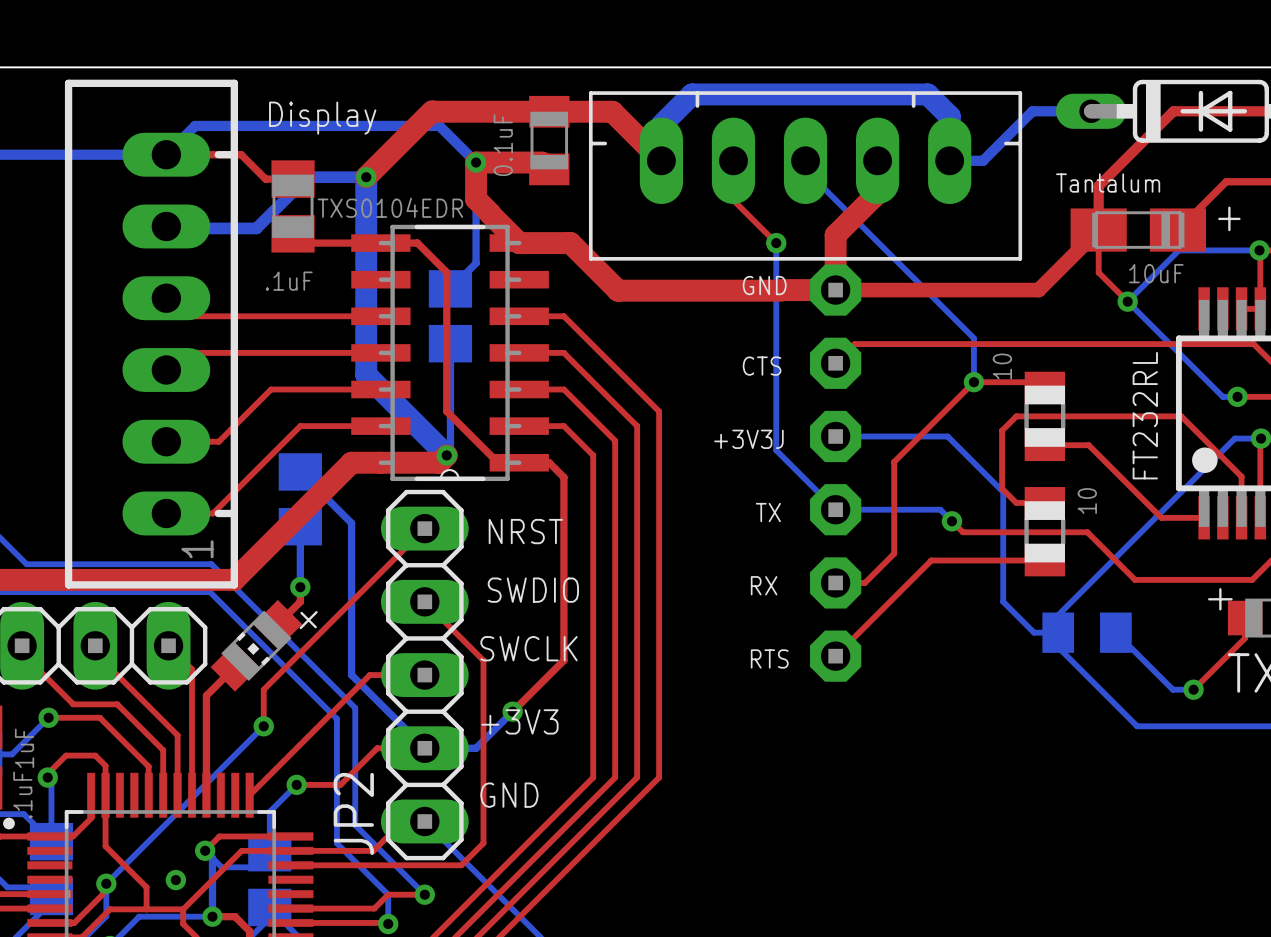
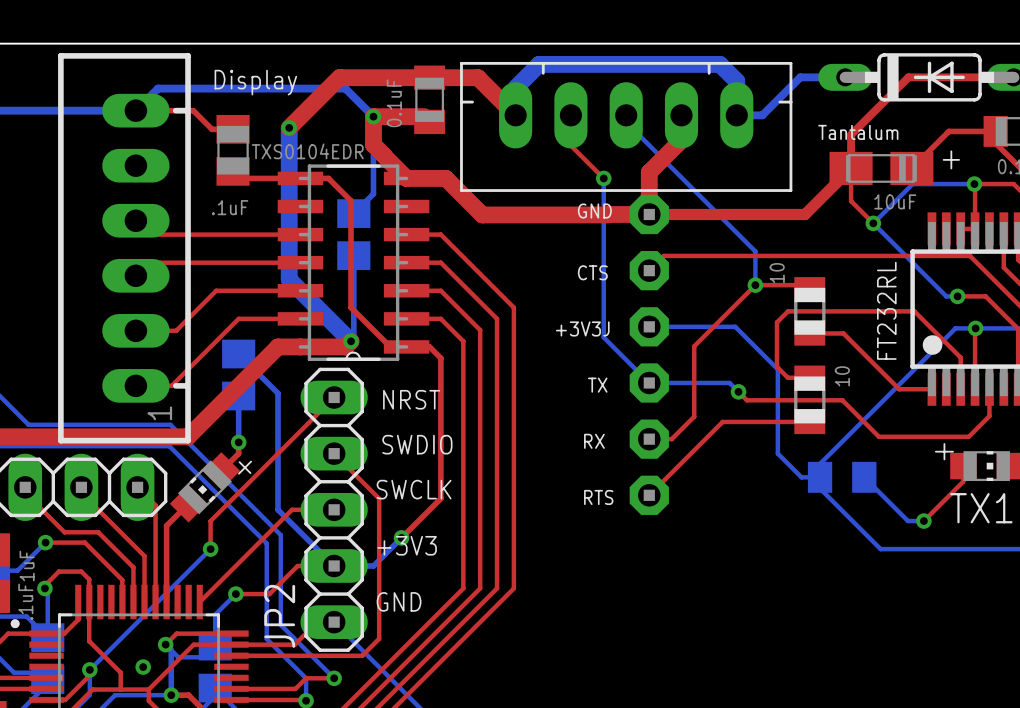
bottom track: (366, 177) (307, 177) (256, 228) (168, 228) (166, 226) -> none

